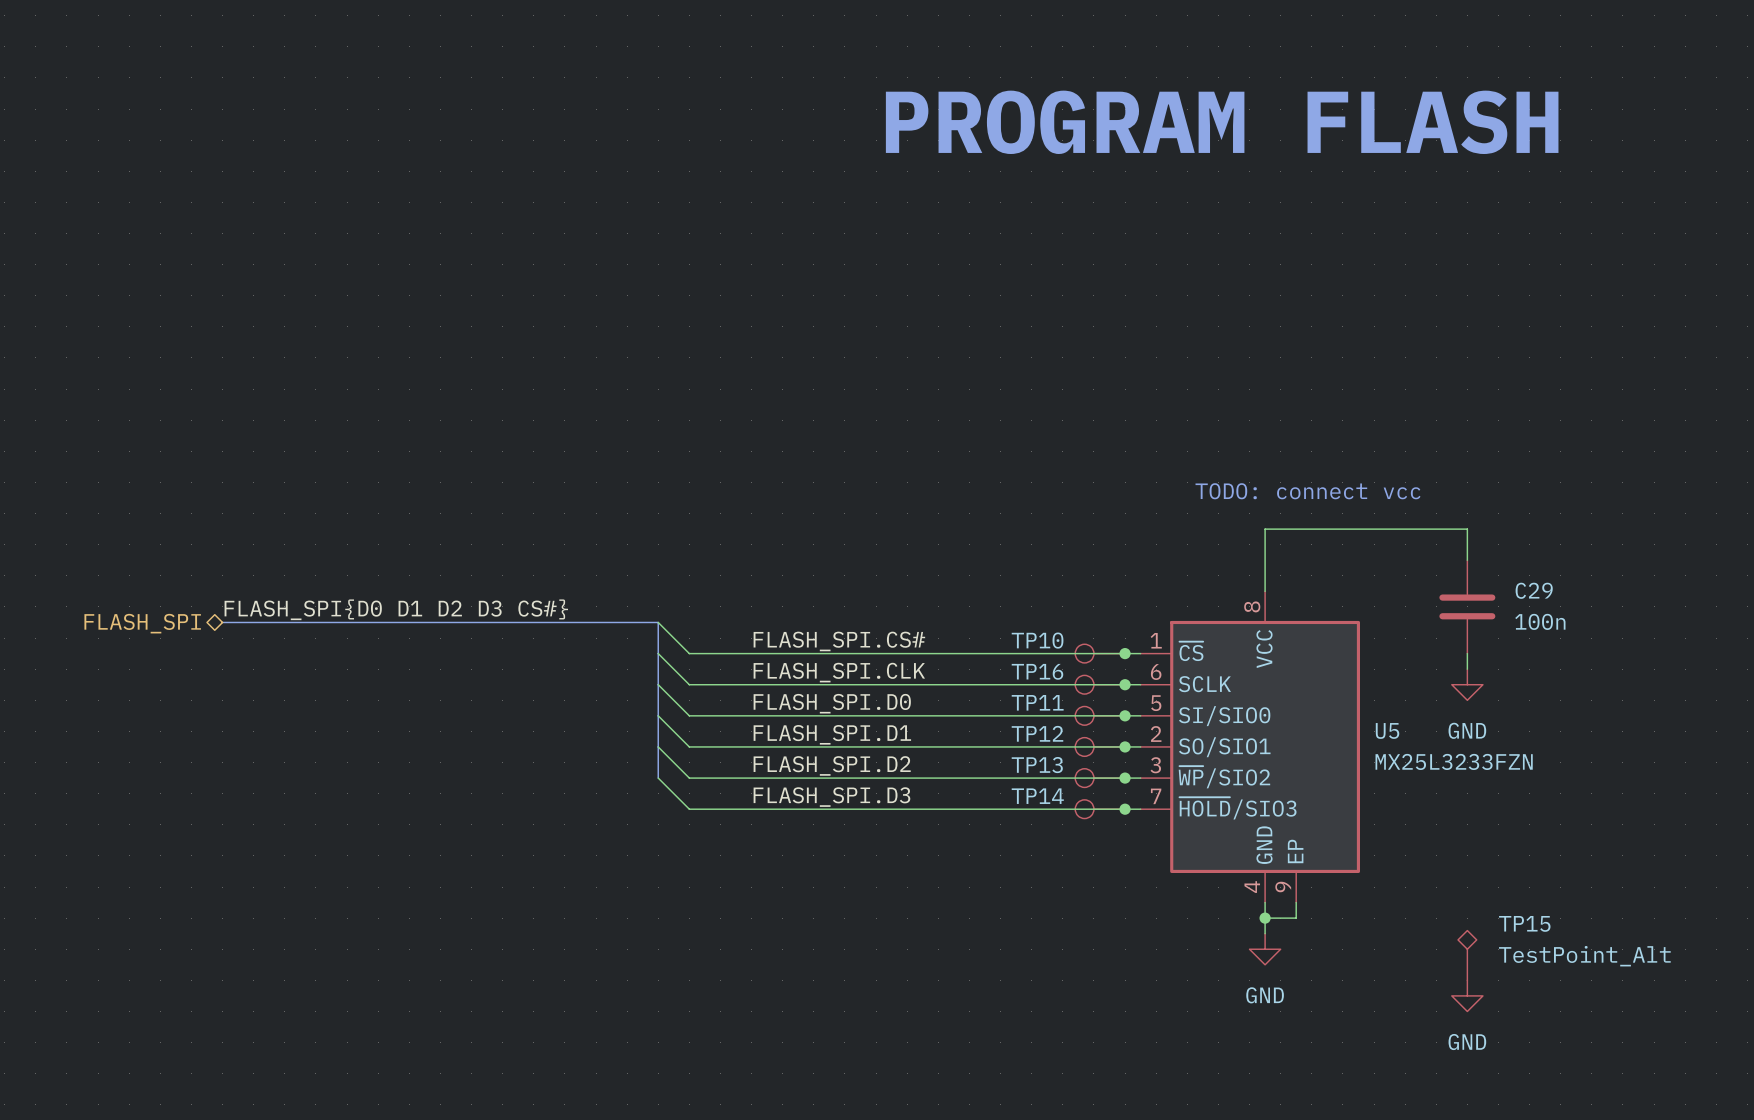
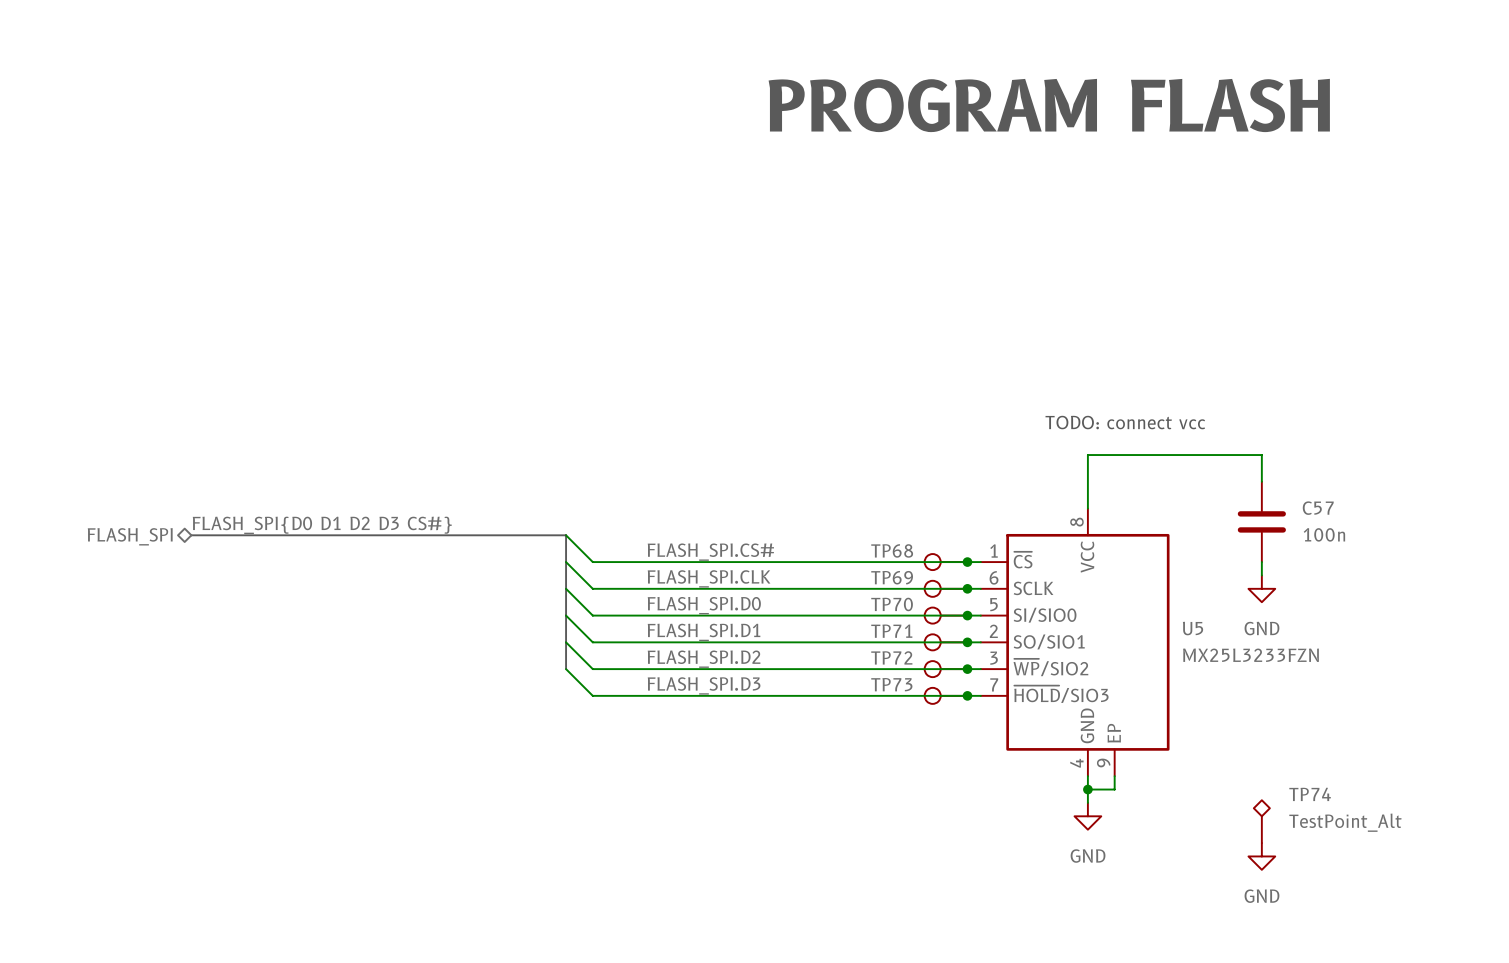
C29 name: C29 (1534, 590) -> C57 (1318, 508)
TP10 name: TP10 (1037, 640) -> TP68 (892, 550)
TP16 name: TP16 (1037, 671) -> TP69 (892, 577)
TP11 name: TP11 (1037, 702) -> TP70 (892, 604)
TP12 name: TP12 (1037, 733) -> TP71 (891, 631)
TP13 name: TP13 (1037, 765) -> TP72 (891, 657)
TP14 name: TP14 (1037, 796) -> TP73 (891, 684)
TP15 name: TP15 (1524, 923) -> TP74 (1310, 794)

